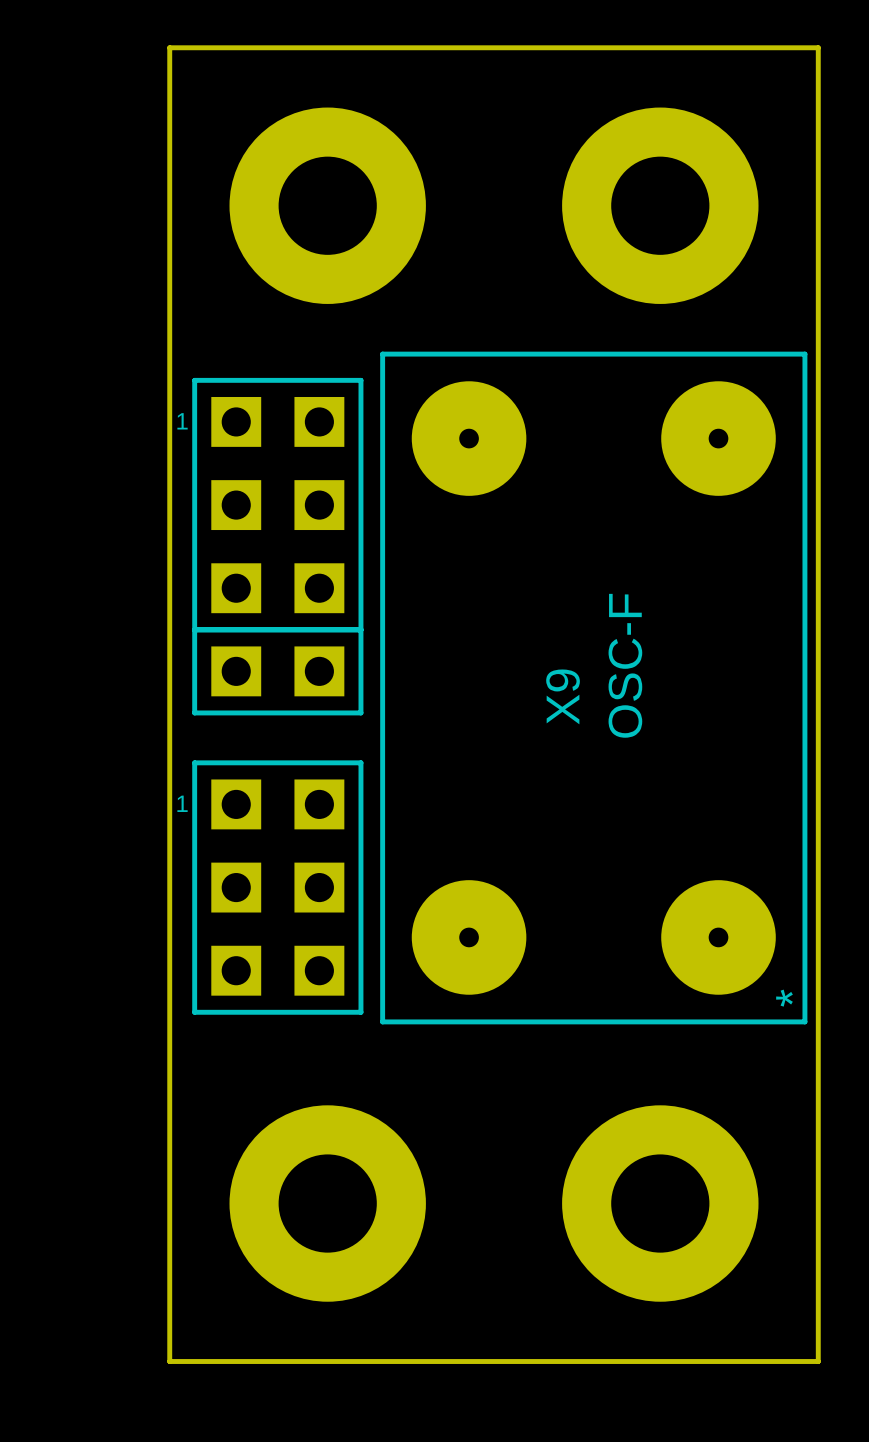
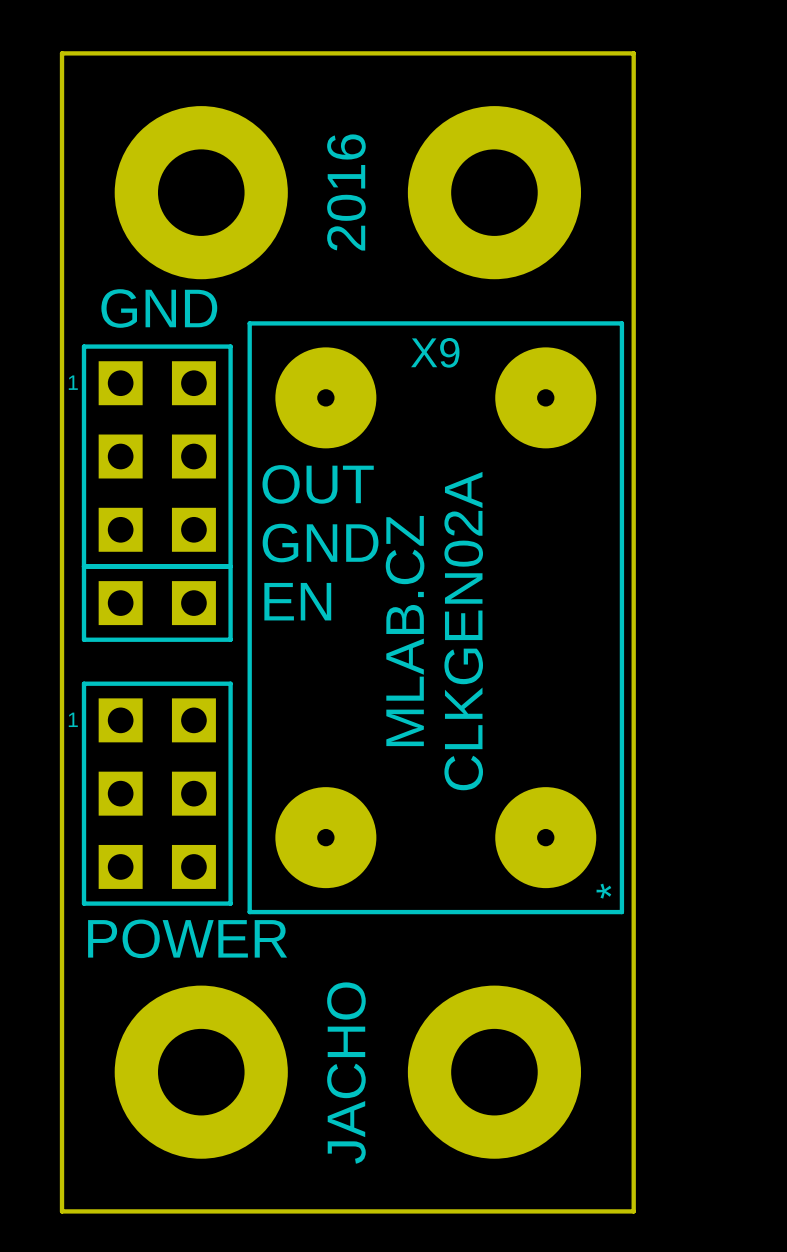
text: none -> 2016 (346, 192)
text: none -> GND (159, 308)
text: none -> OUT (318, 484)
text: none -> GND (320, 543)
X9 value: OSC-F (625, 665) -> none
text: none -> EN (297, 601)
X9 name rotation: 0° (563, 696) -> 90° clockwise (435, 352)
X9 name position: X9 (563, 696) -> X9 (435, 352)
text: none -> MLAB.CZ (405, 631)
text: none -> CLKGEN02A (463, 631)
text: none -> POWER (187, 938)
text: none -> JACHO (346, 1073)

